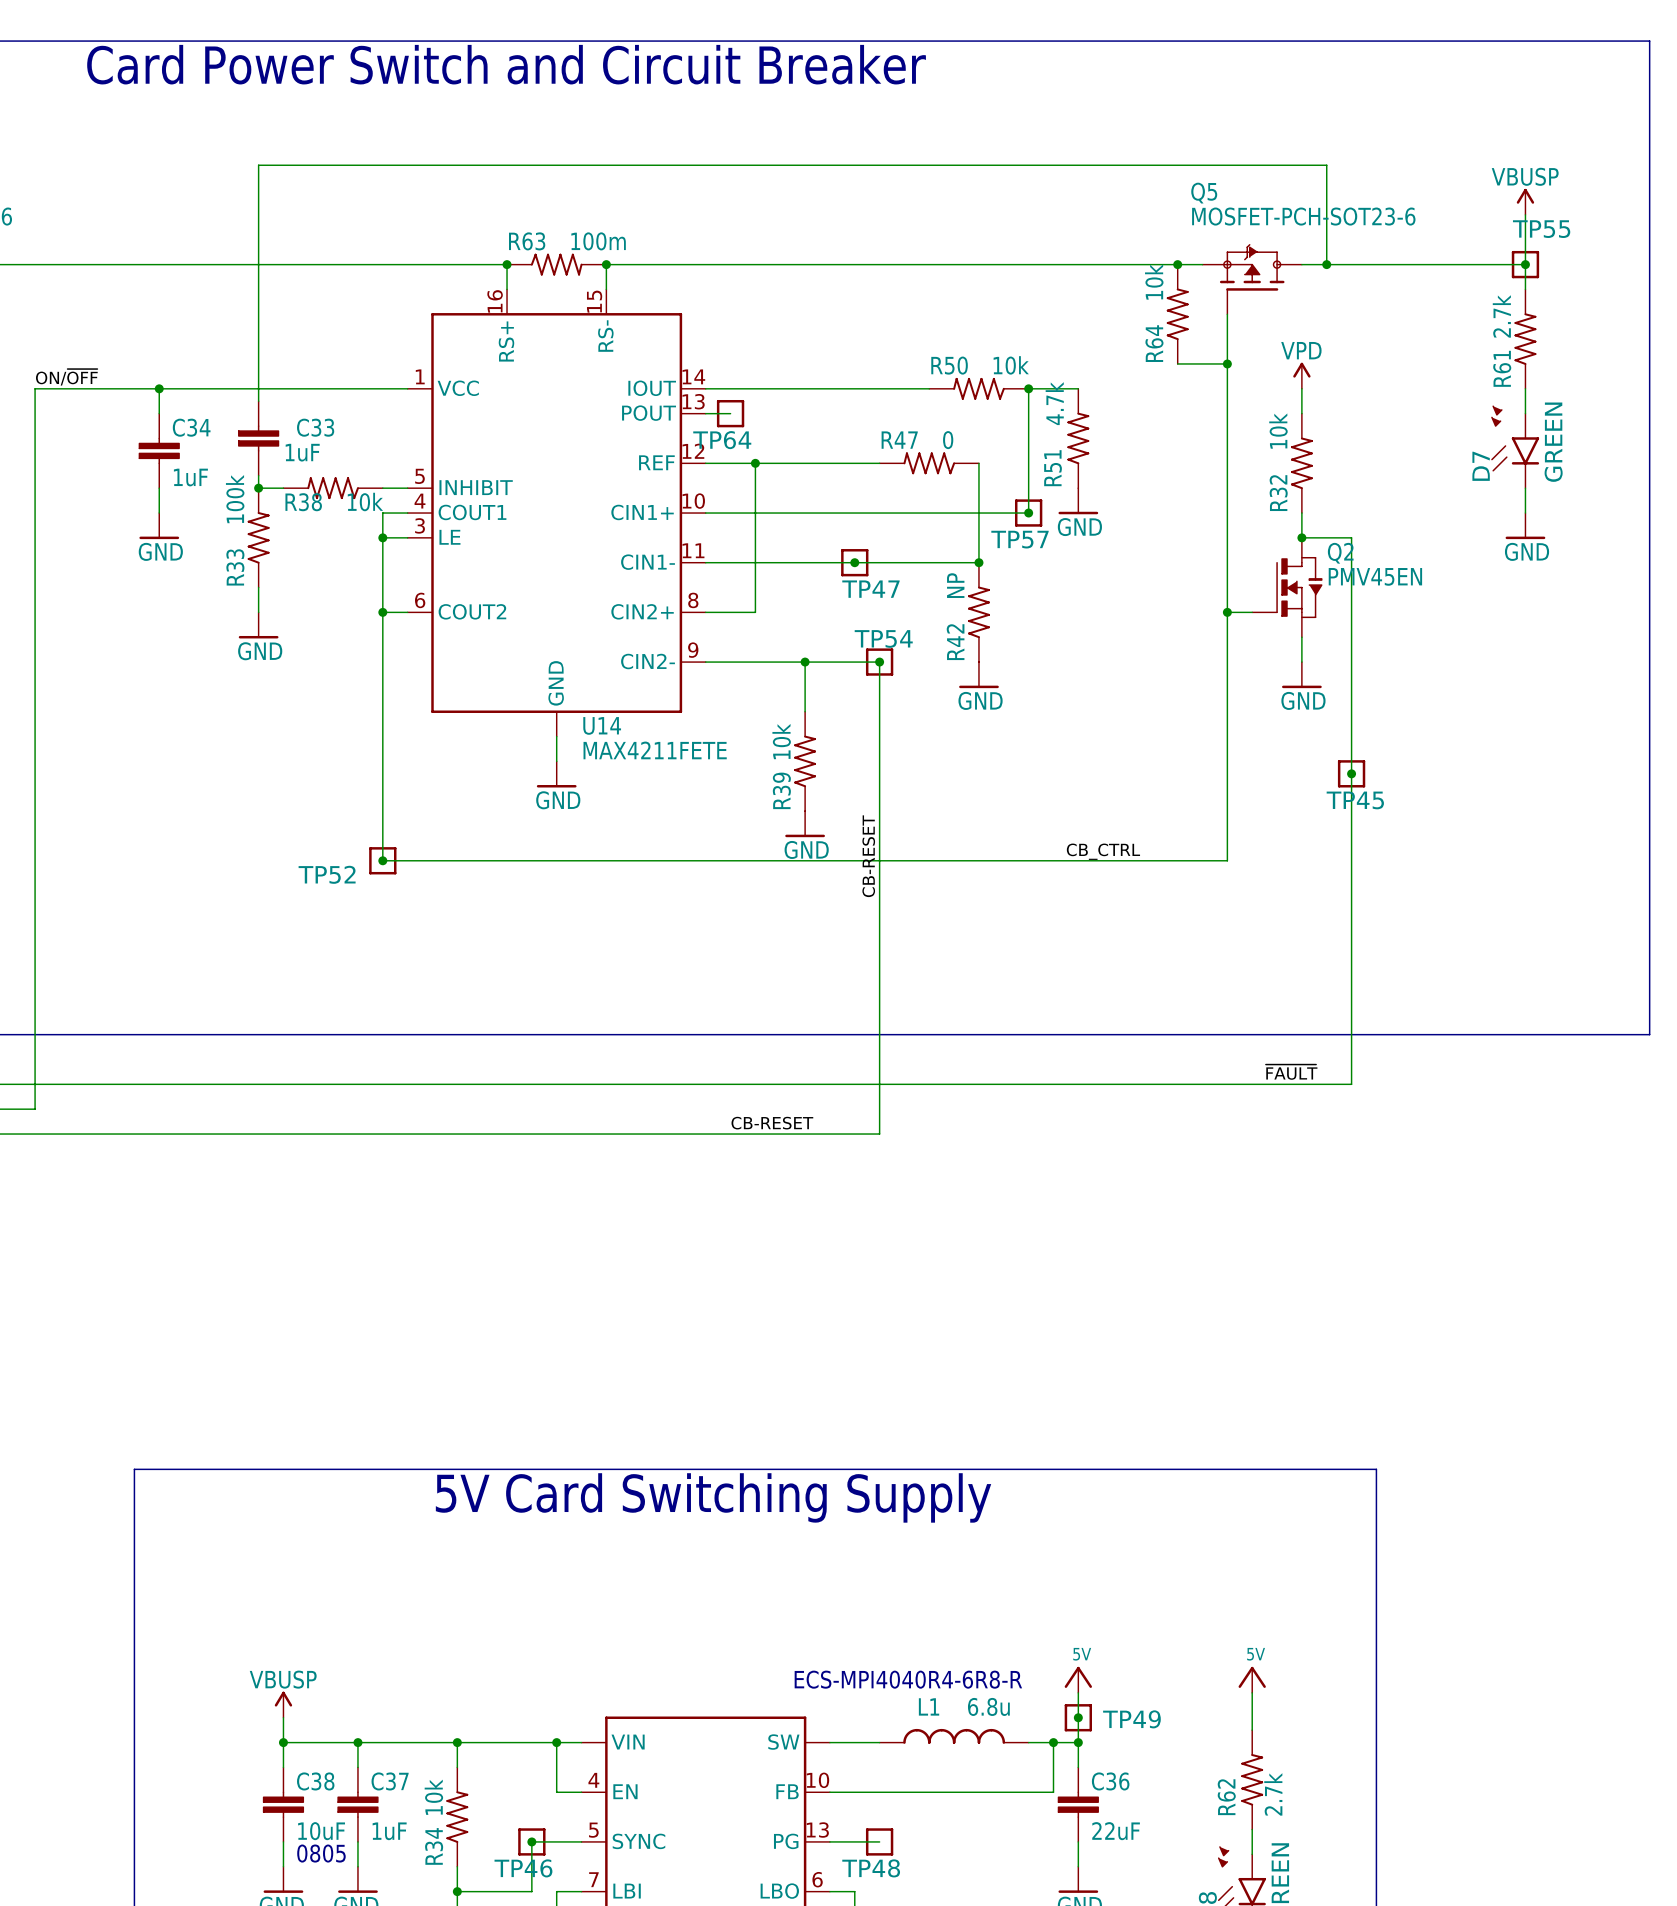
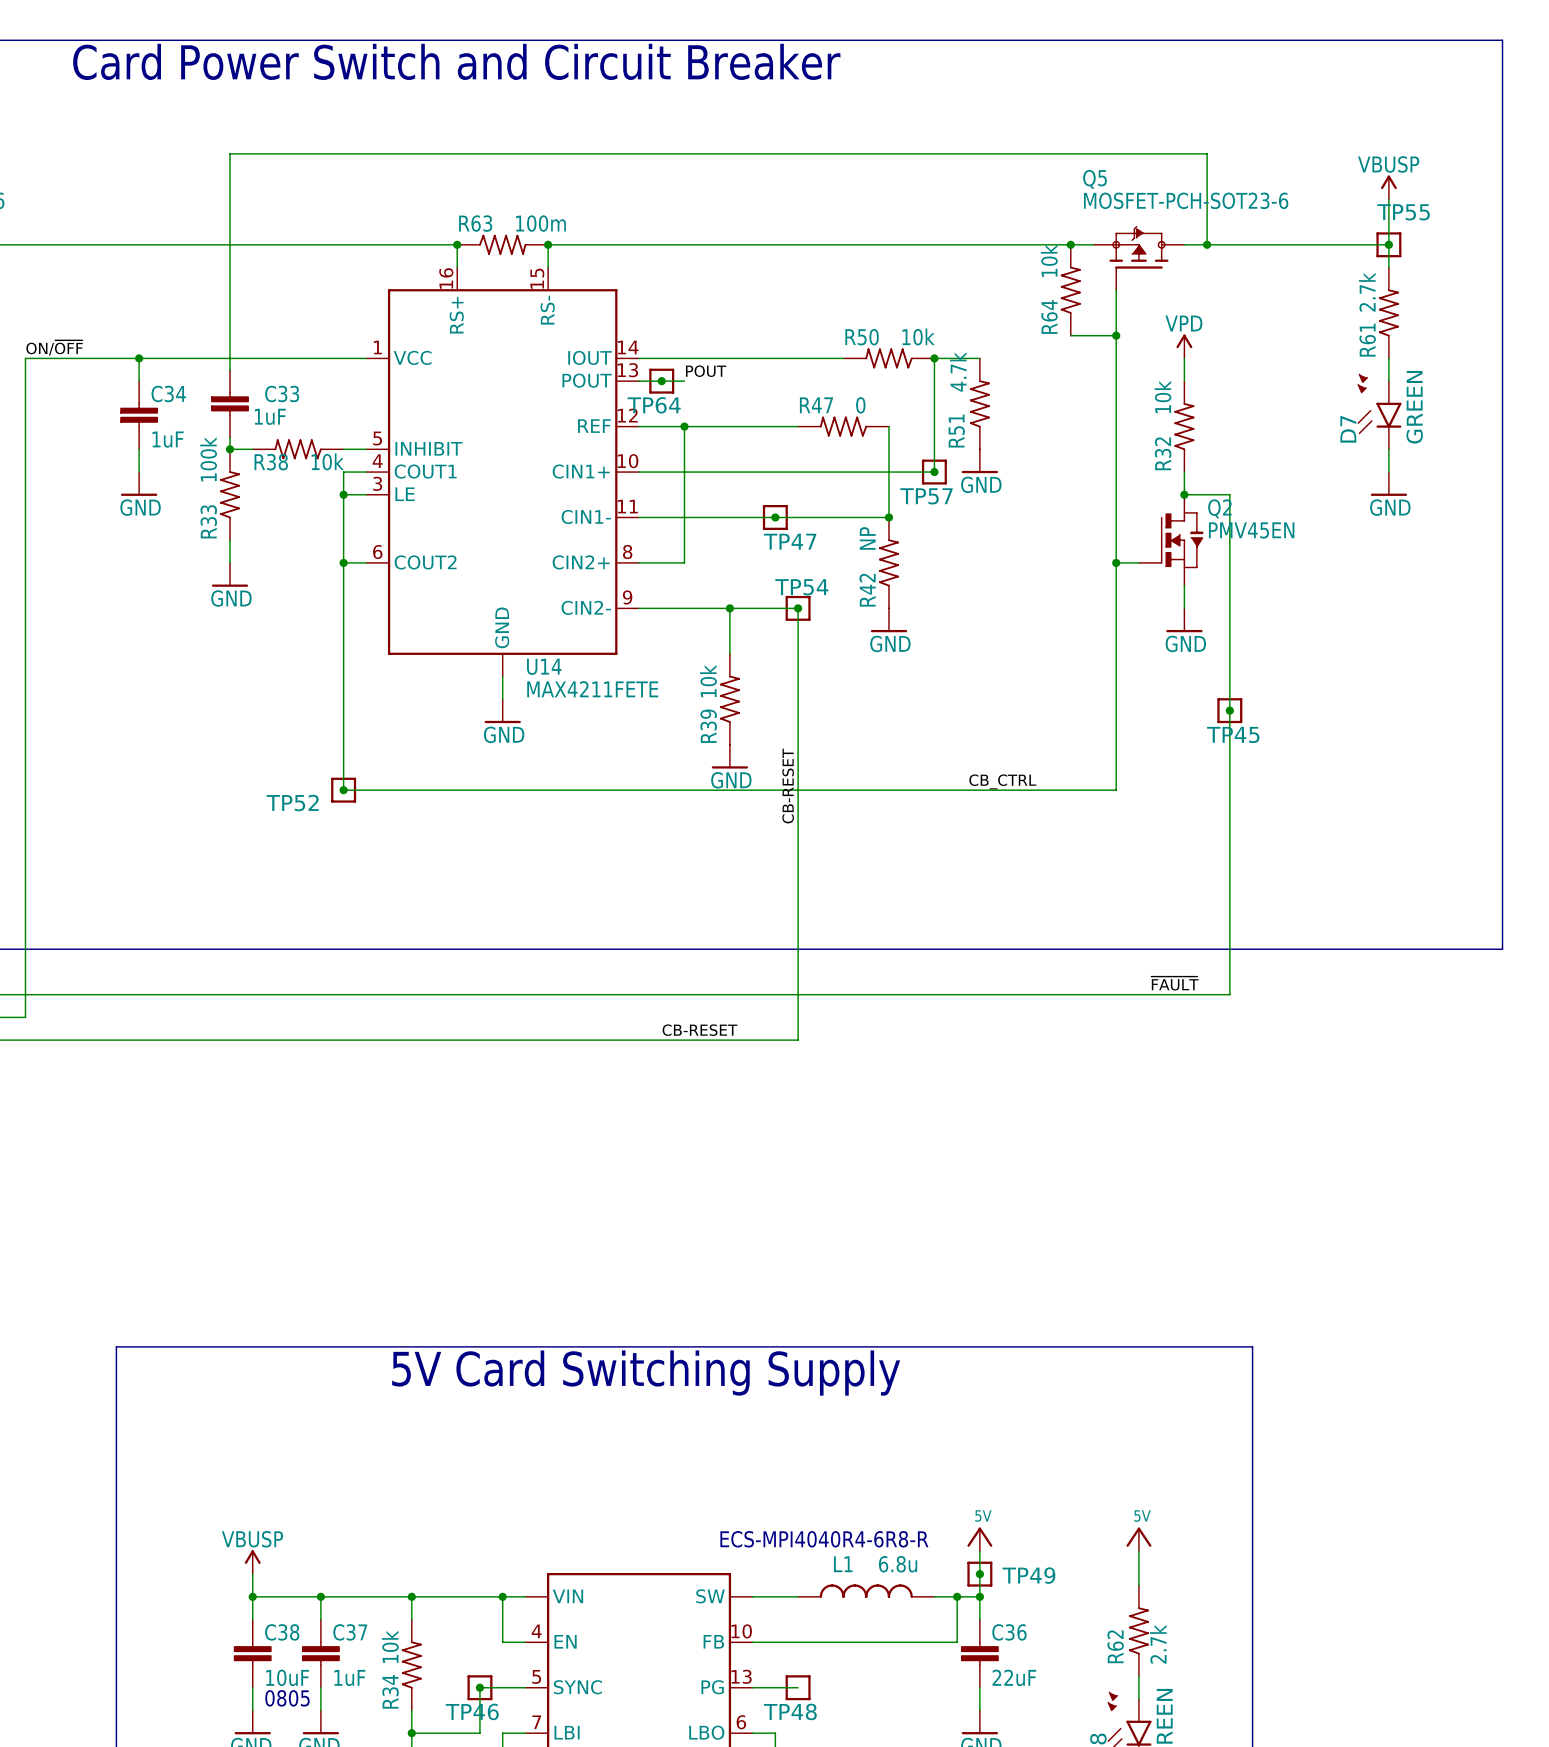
label: none -> POUT (706, 371)
wire: none -> (661, 381) (684, 381)
junction: none -> (661, 381)

